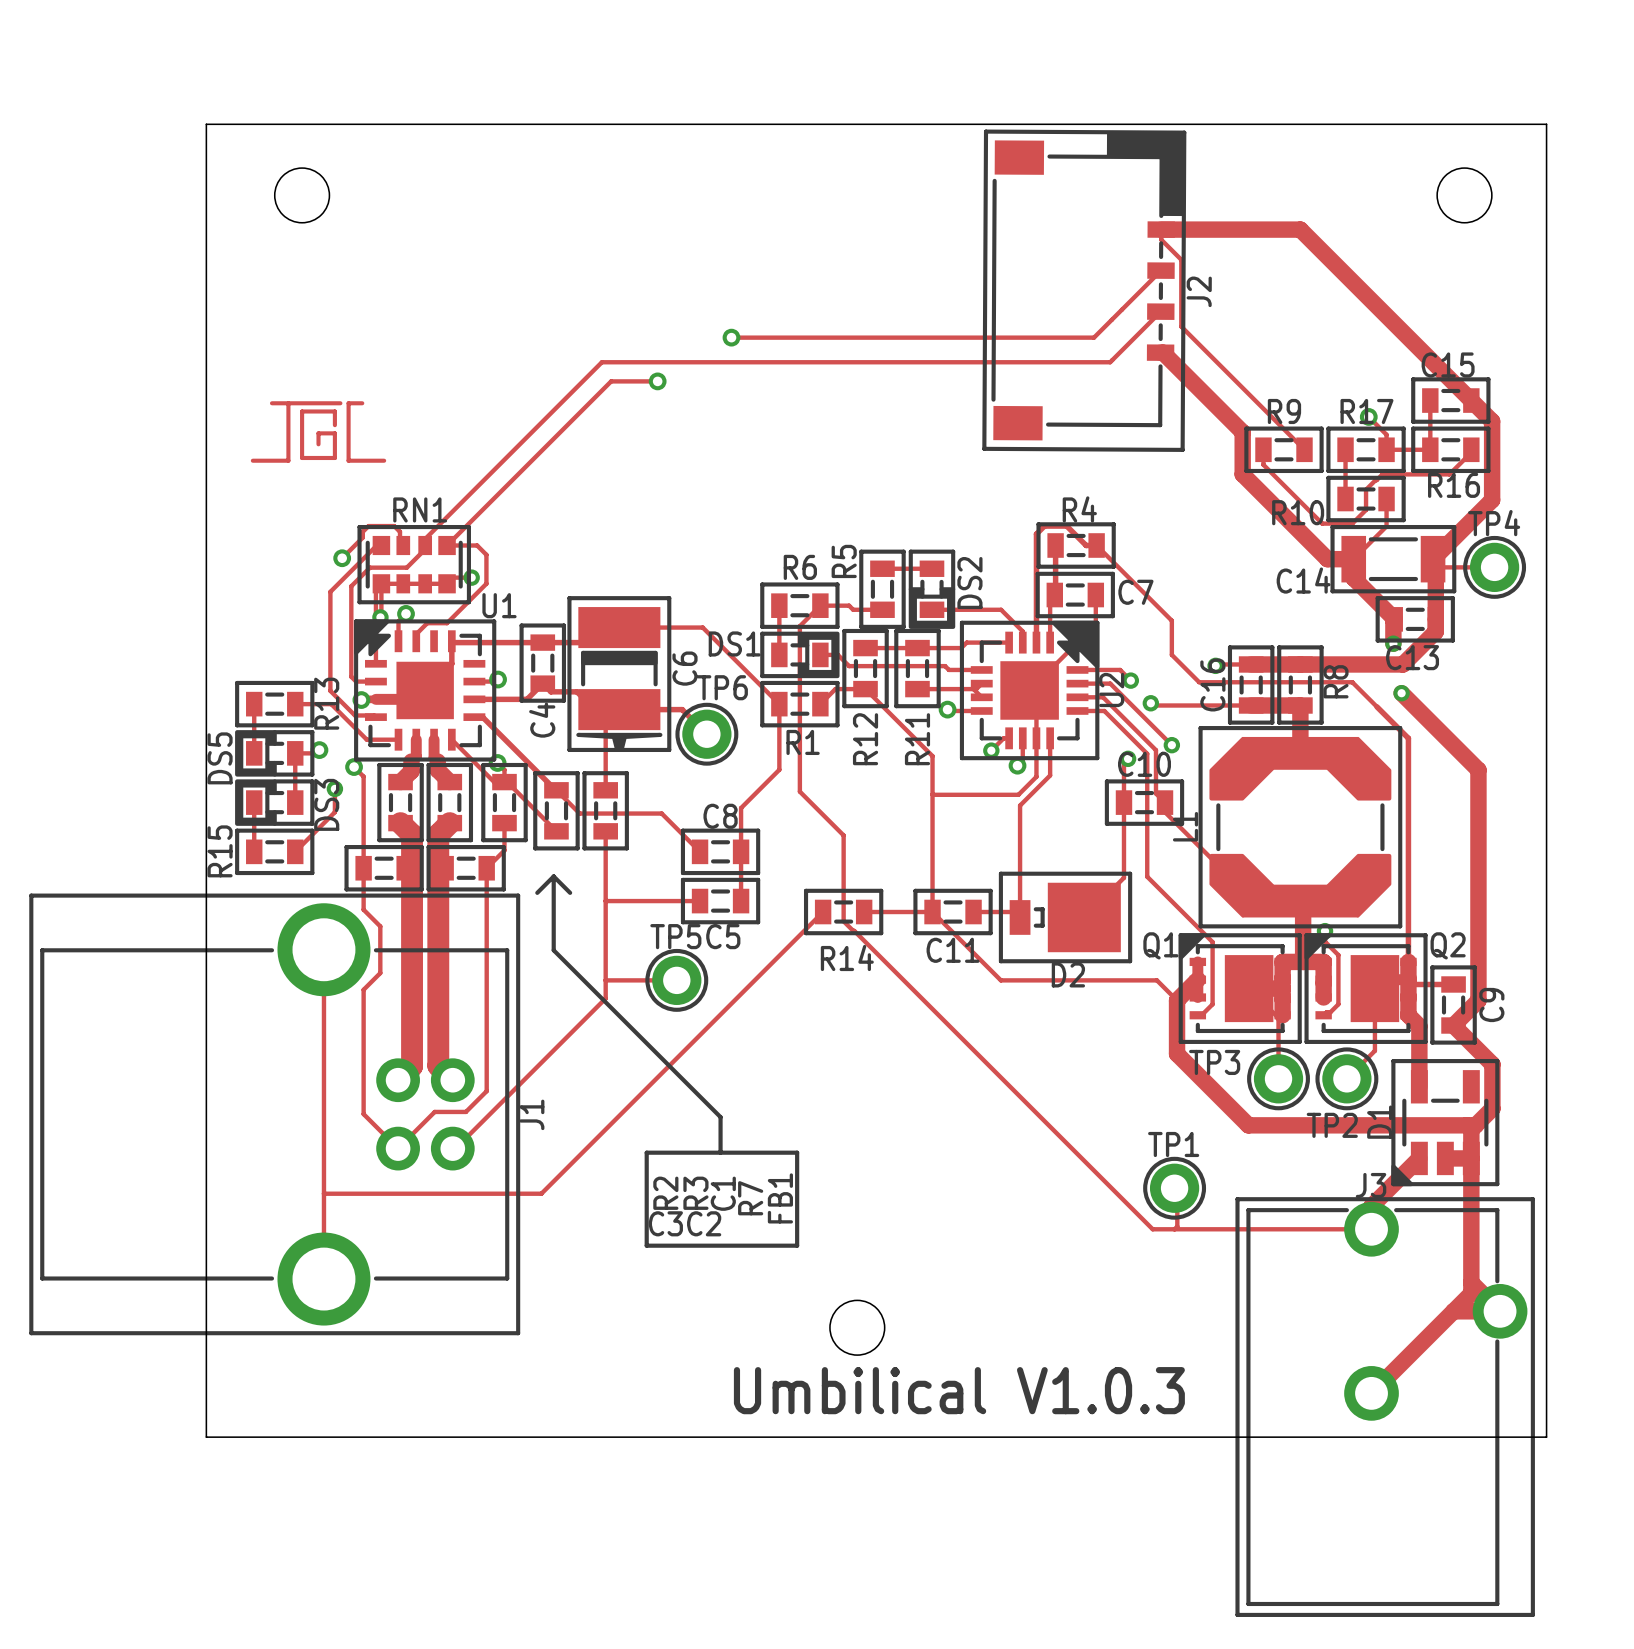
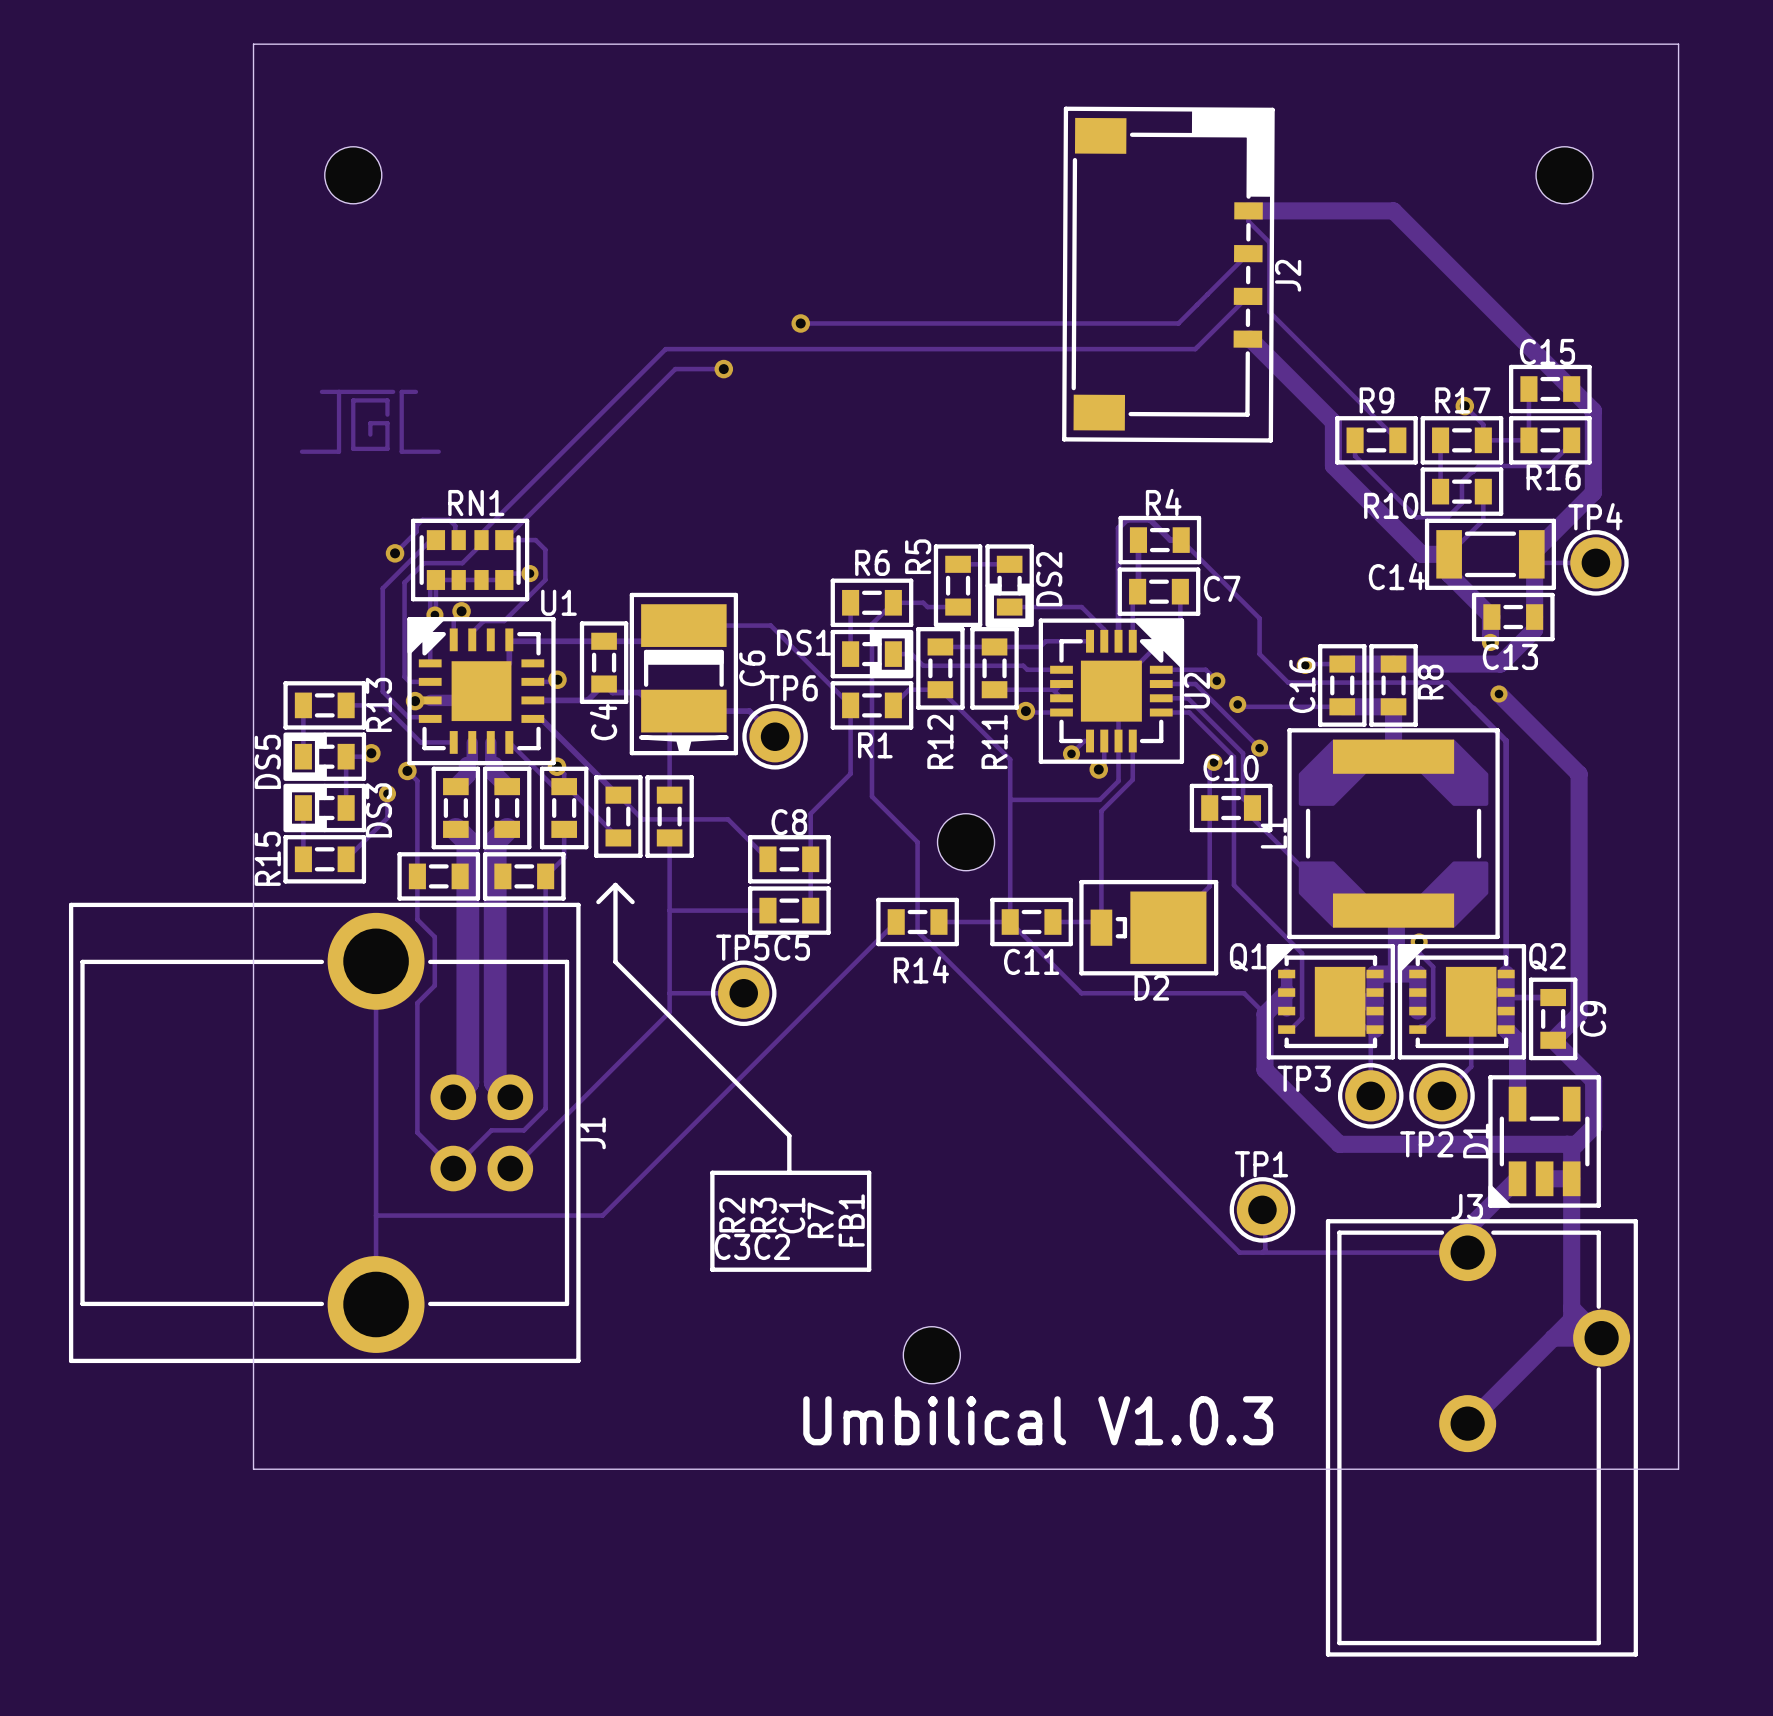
board edge: (206, 124) (1546, 124) (1546, 1437) -> (253, 101) (253, 44) (1678, 44) (1678, 1469) (1650, 1469)
hole: none -> (966, 842)

